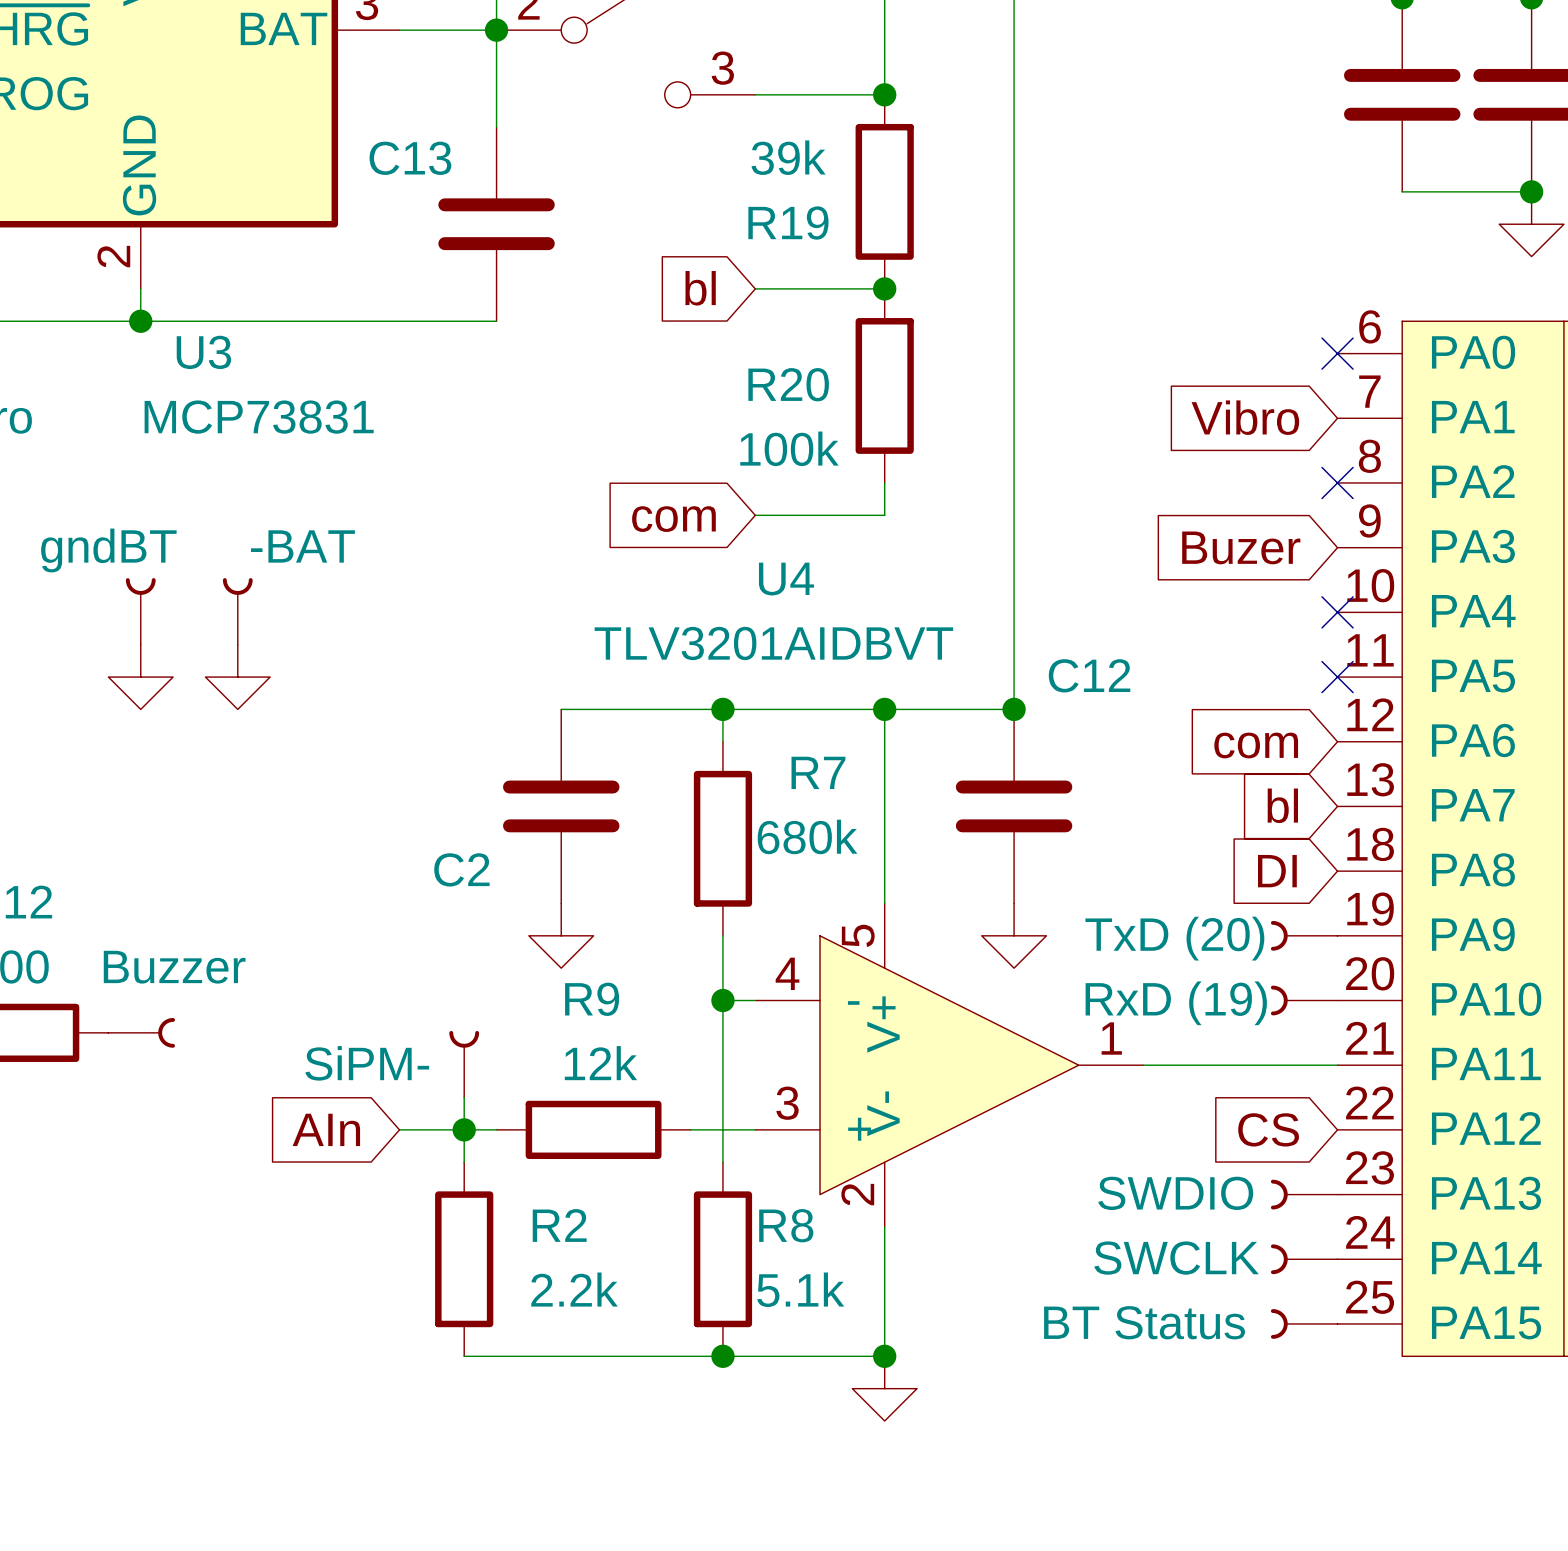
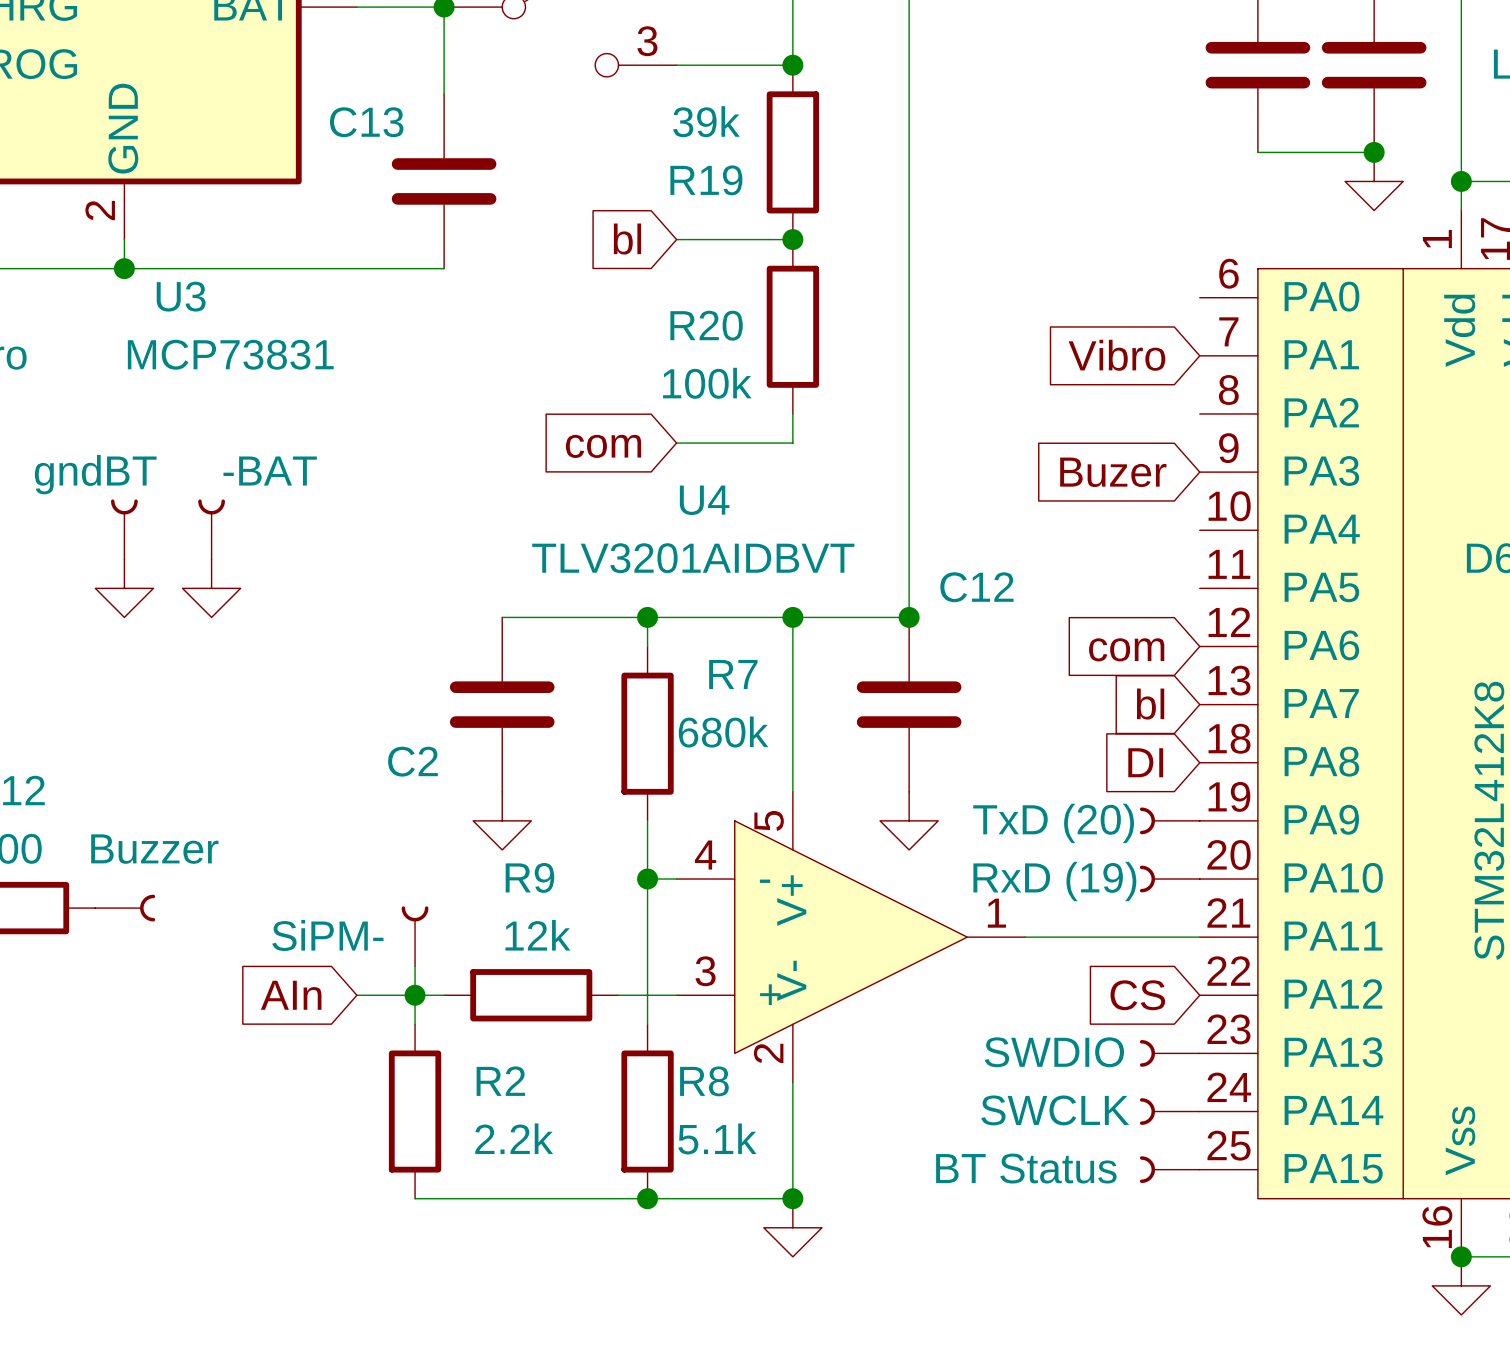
no-connect mark: (1337, 353) -> none
no-connect mark: (1337, 482) -> none
no-connect mark: (1337, 612) -> none
no-connect mark: (1337, 677) -> none

